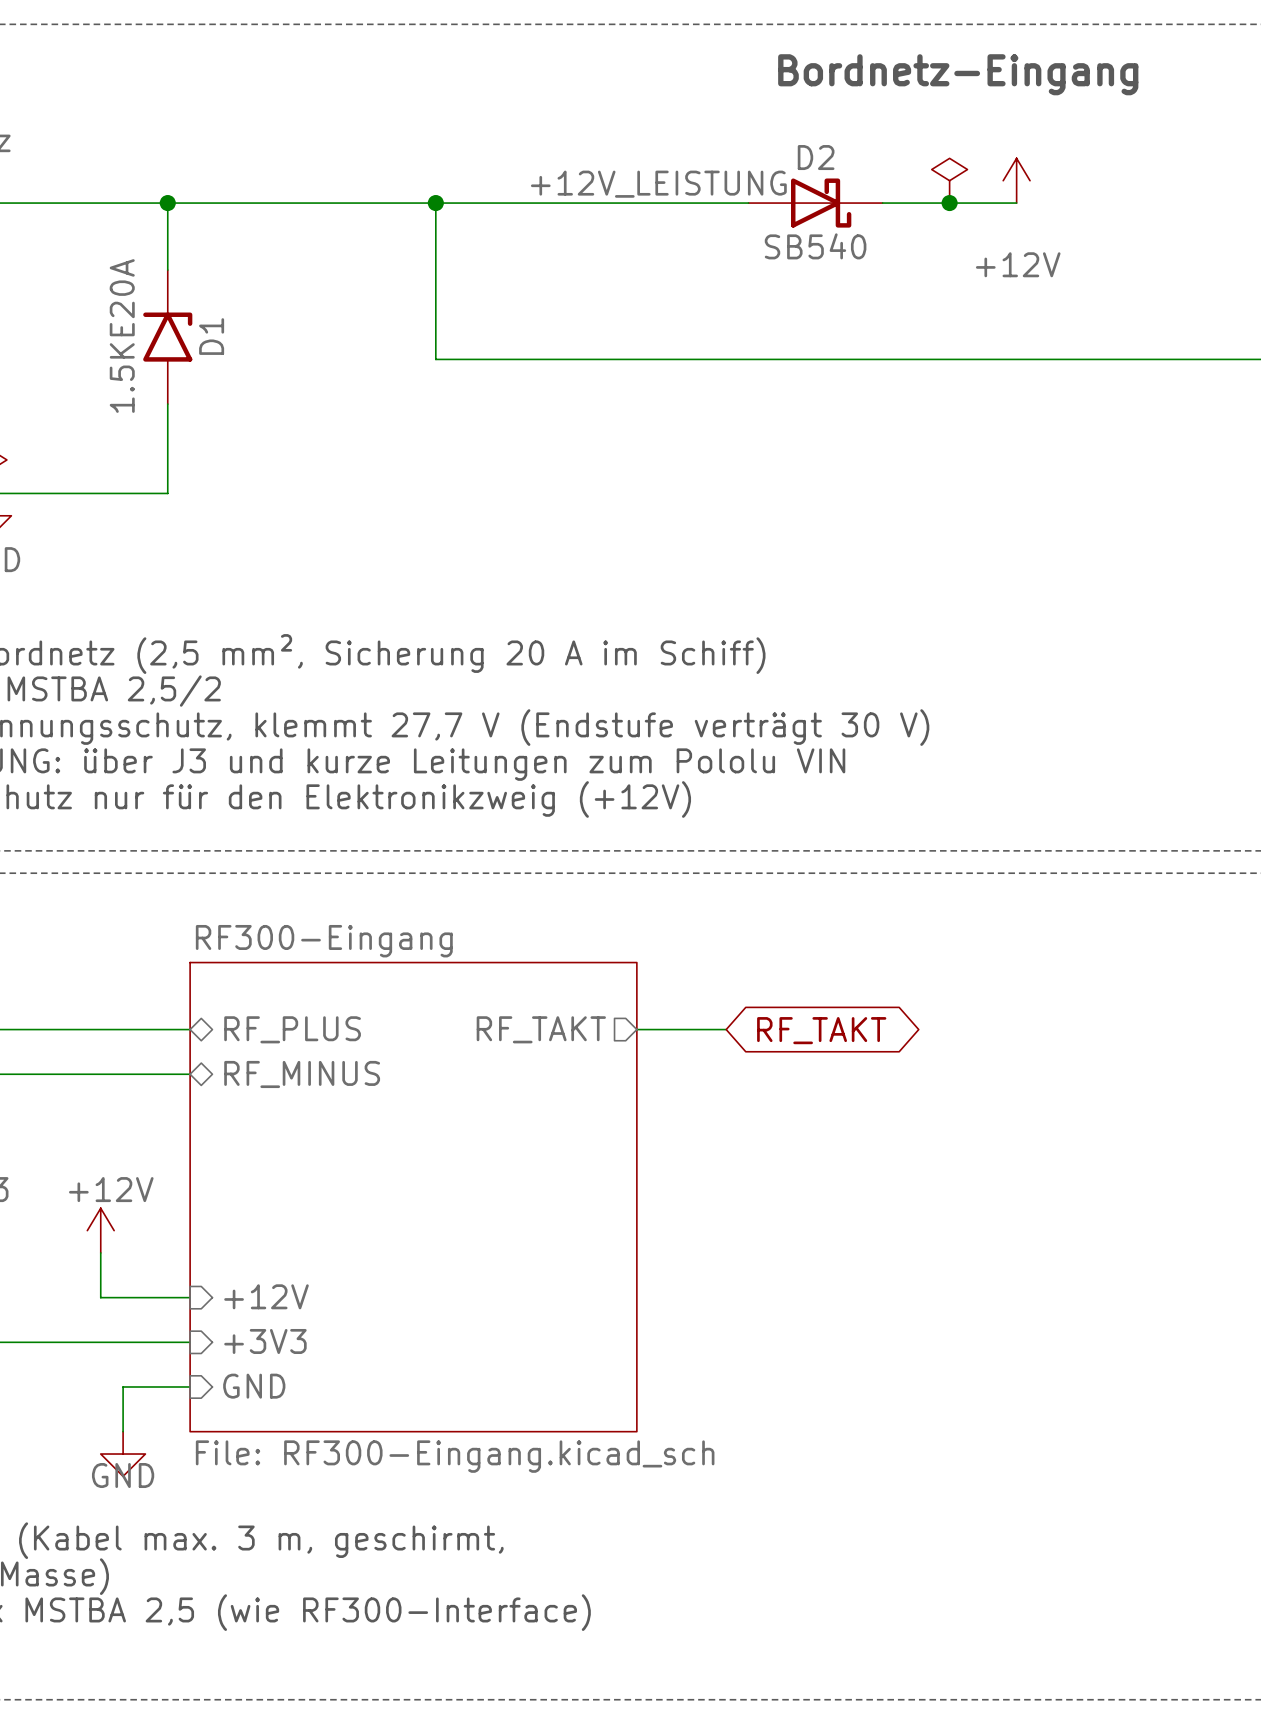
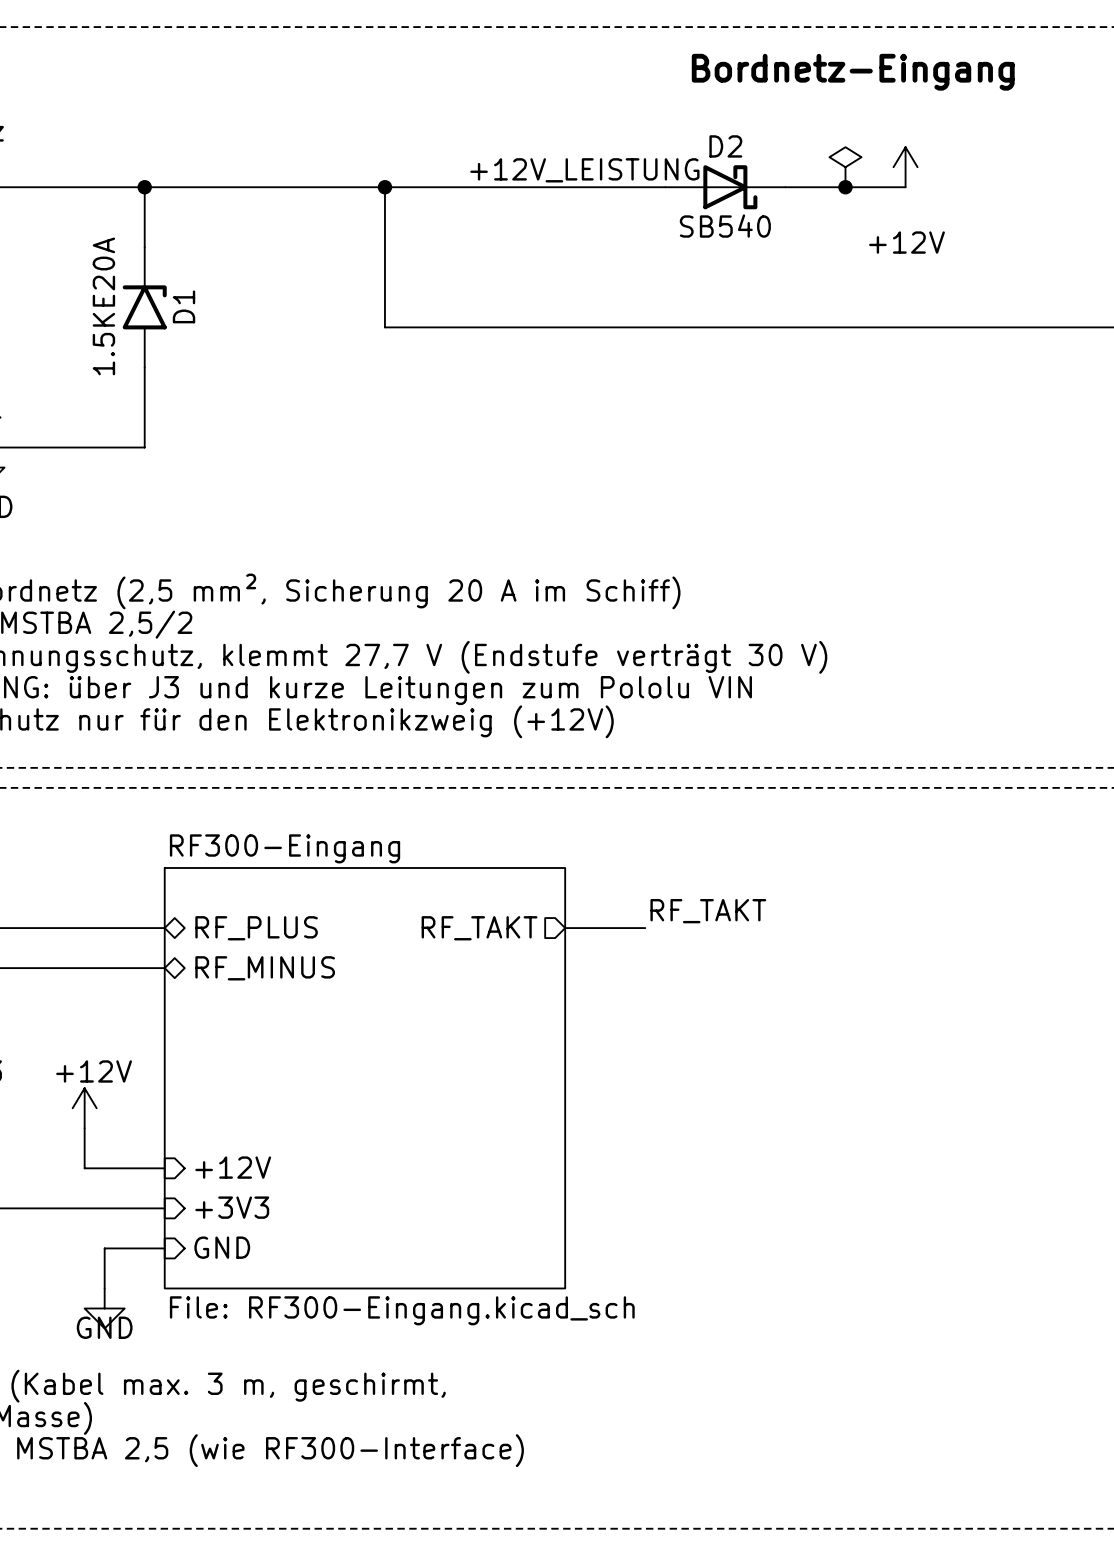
label: none -> RF_TAKT (708, 911)
global label: RF_TAKT (821, 1030) -> none

